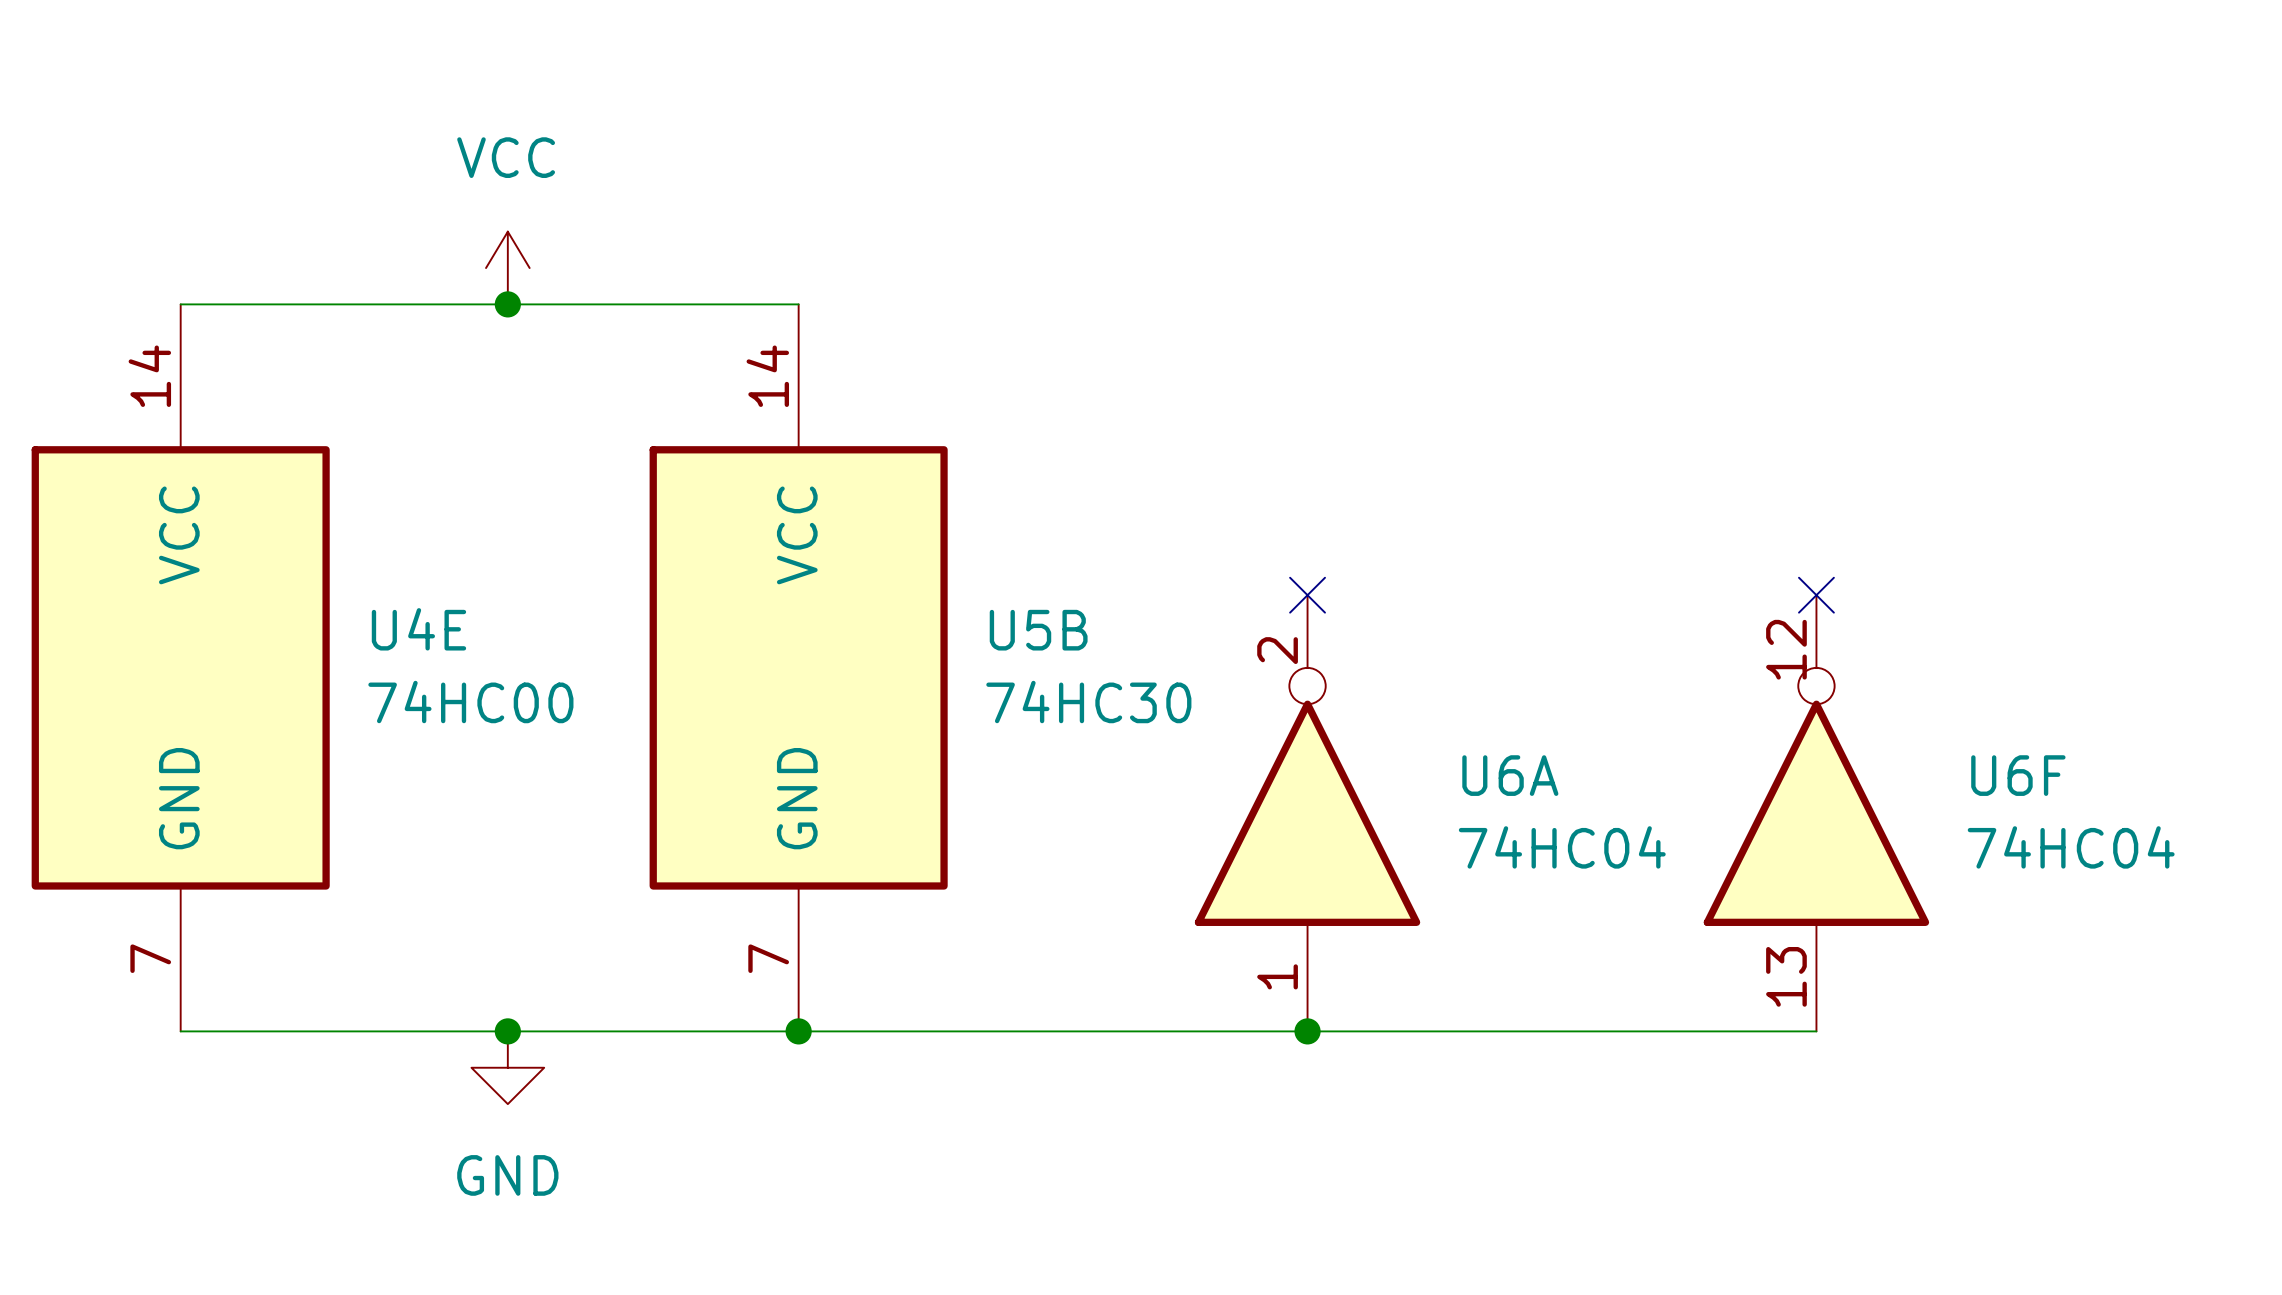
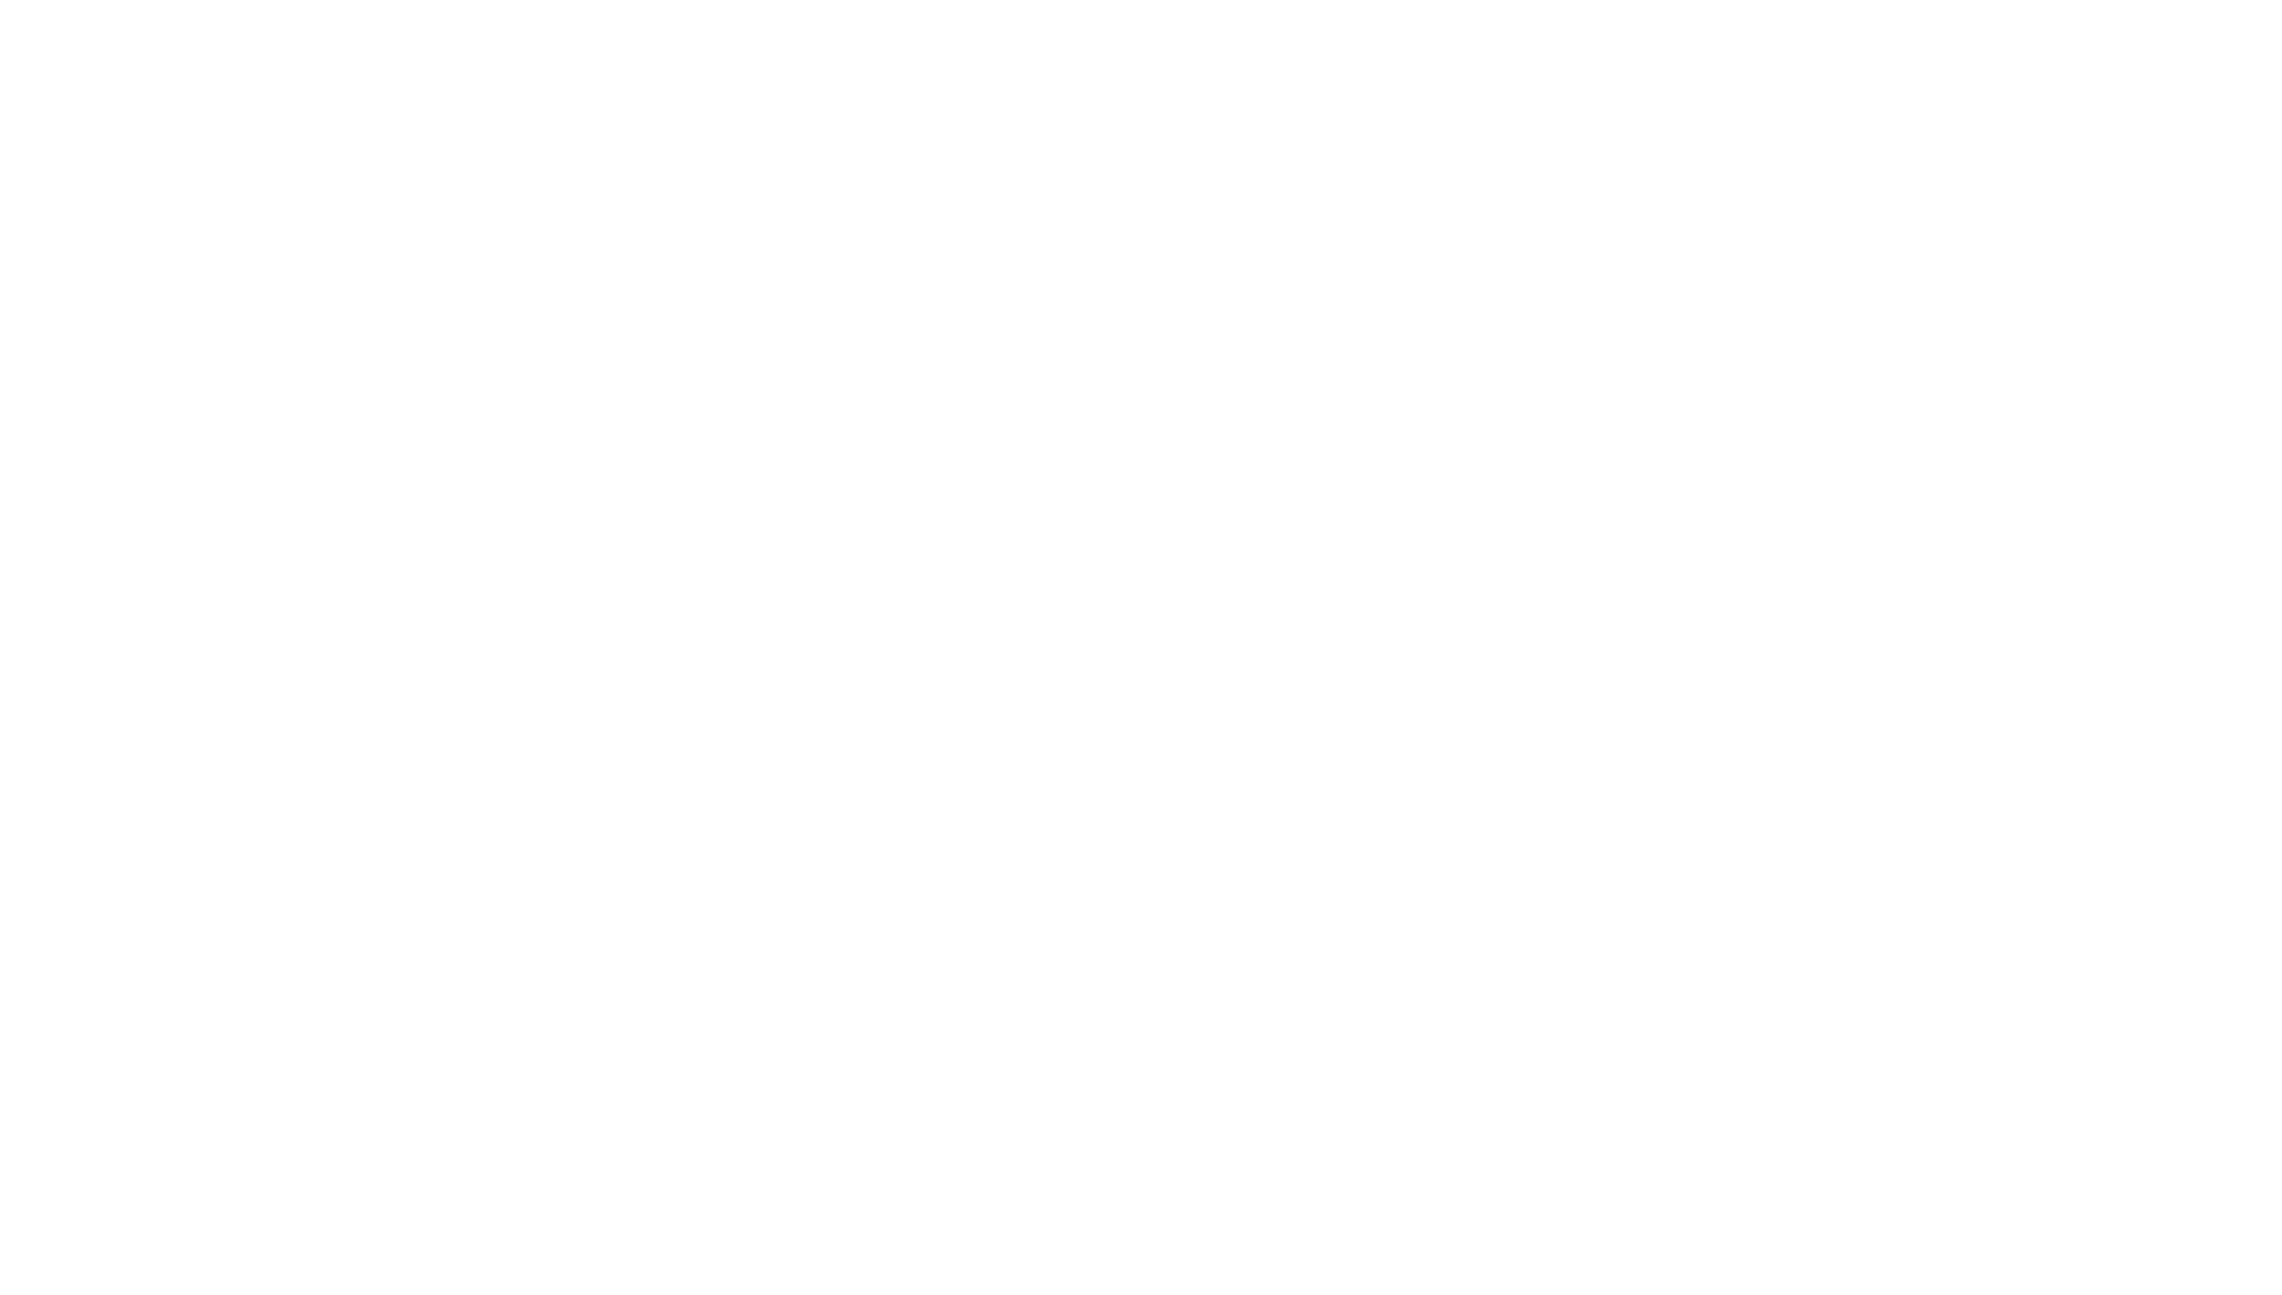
power symbol: VCC (507, 268) -> none
wire: (180, 304) (798, 304) -> none
junction: (507, 304) -> none
no-connect mark: (1307, 595) -> none
no-connect mark: (1816, 595) -> none
U4E: 74HC00 (180, 667) -> none
U5B: 74HC30 (798, 667) -> none
U6A: 74HC04 (1307, 813) -> none
U6F: 74HC04 (1816, 813) -> none
wire: (180, 1031) (1816, 1031) -> none
junction: (507, 1031) -> none
junction: (798, 1031) -> none
junction: (1307, 1031) -> none
power symbol: GND (507, 1067) -> none

